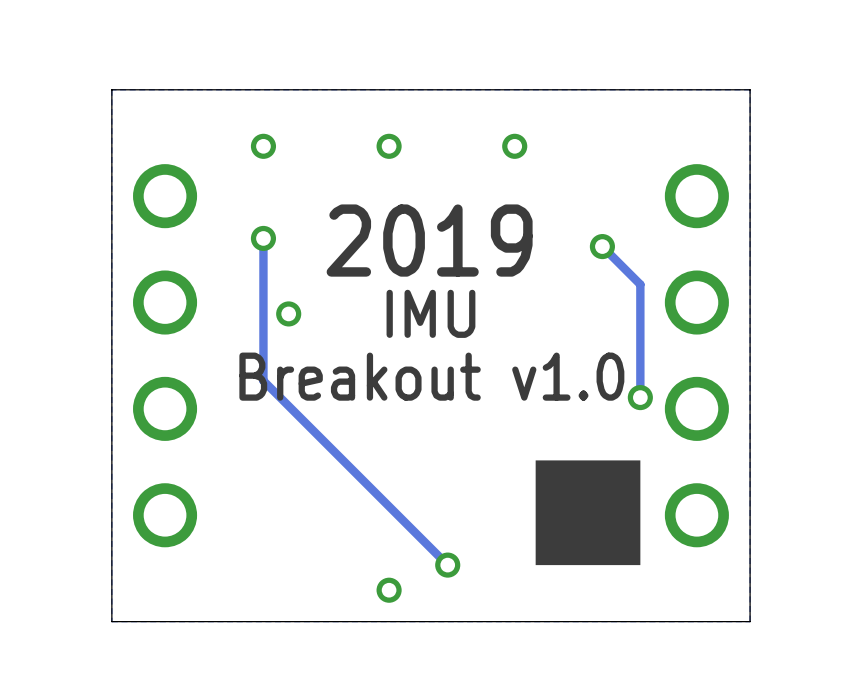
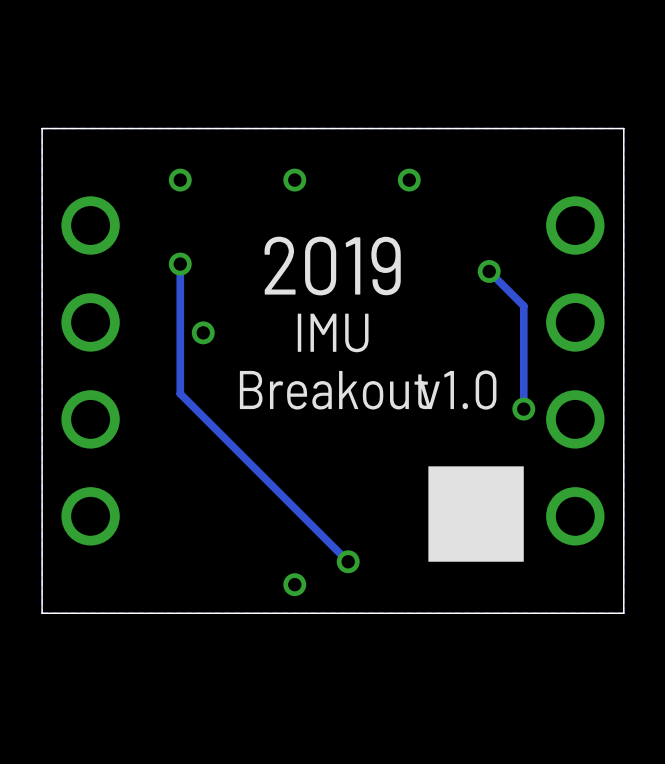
text: Breakout v1.0 (431, 376) -> Breakout (333, 390)
text: none -> v1.0 (458, 390)

